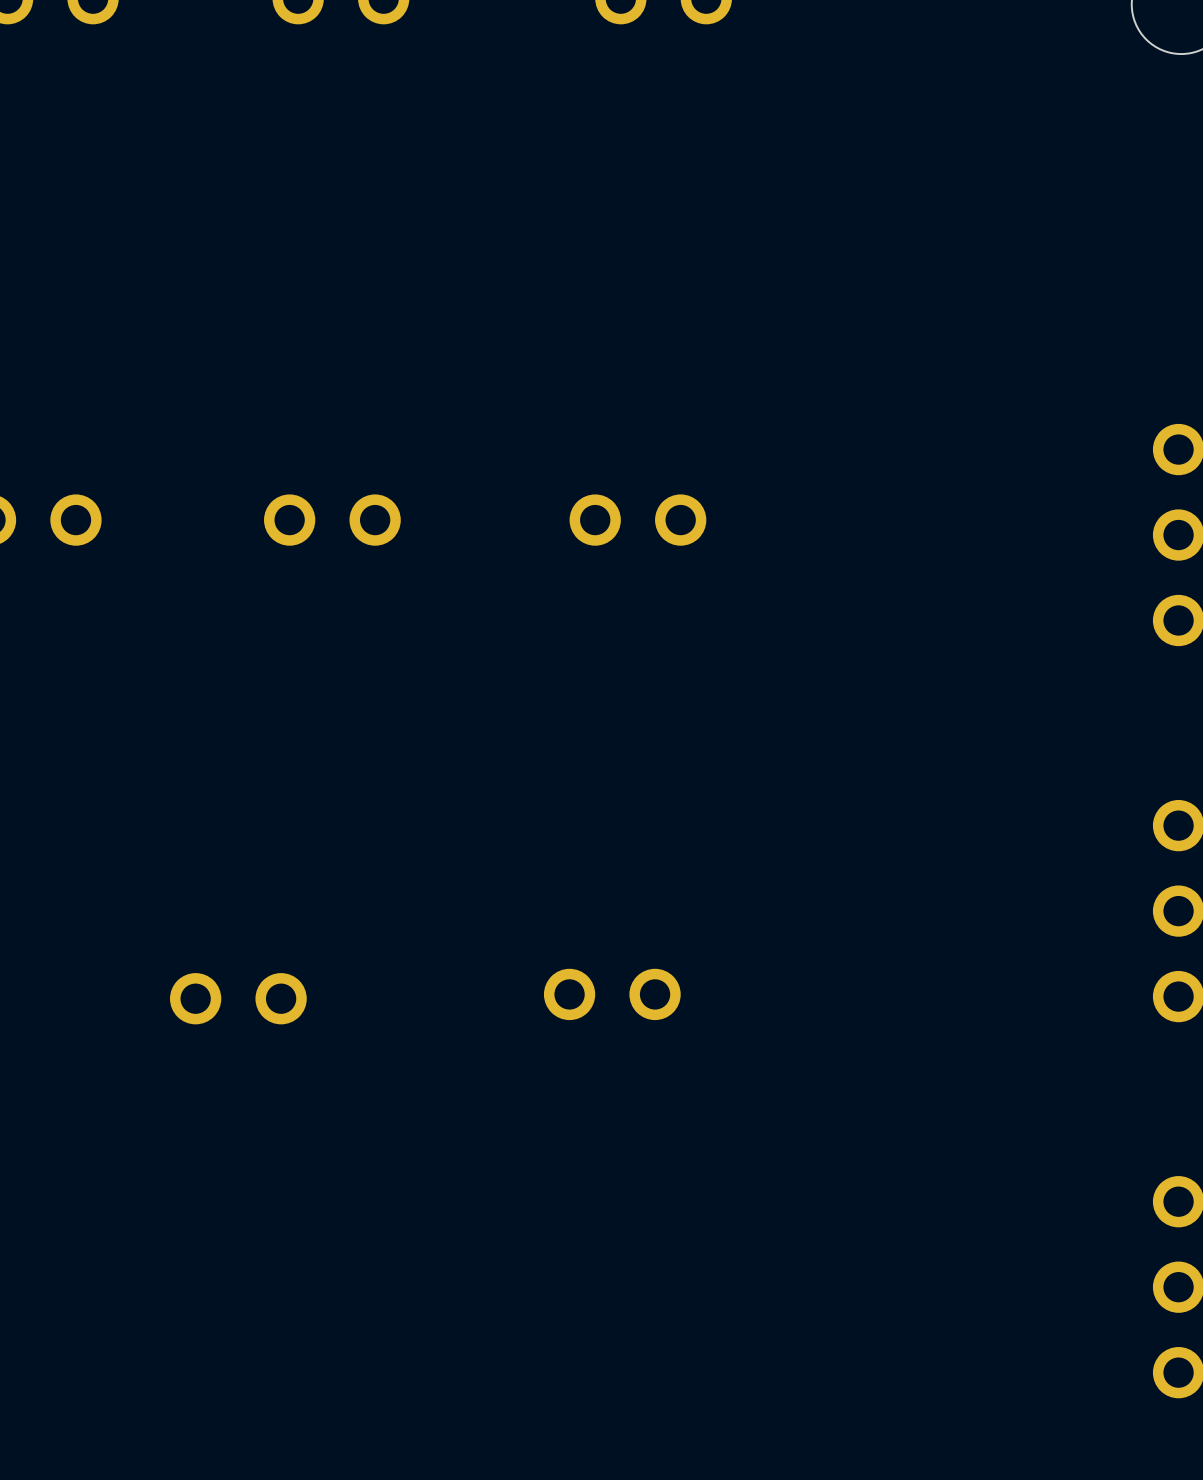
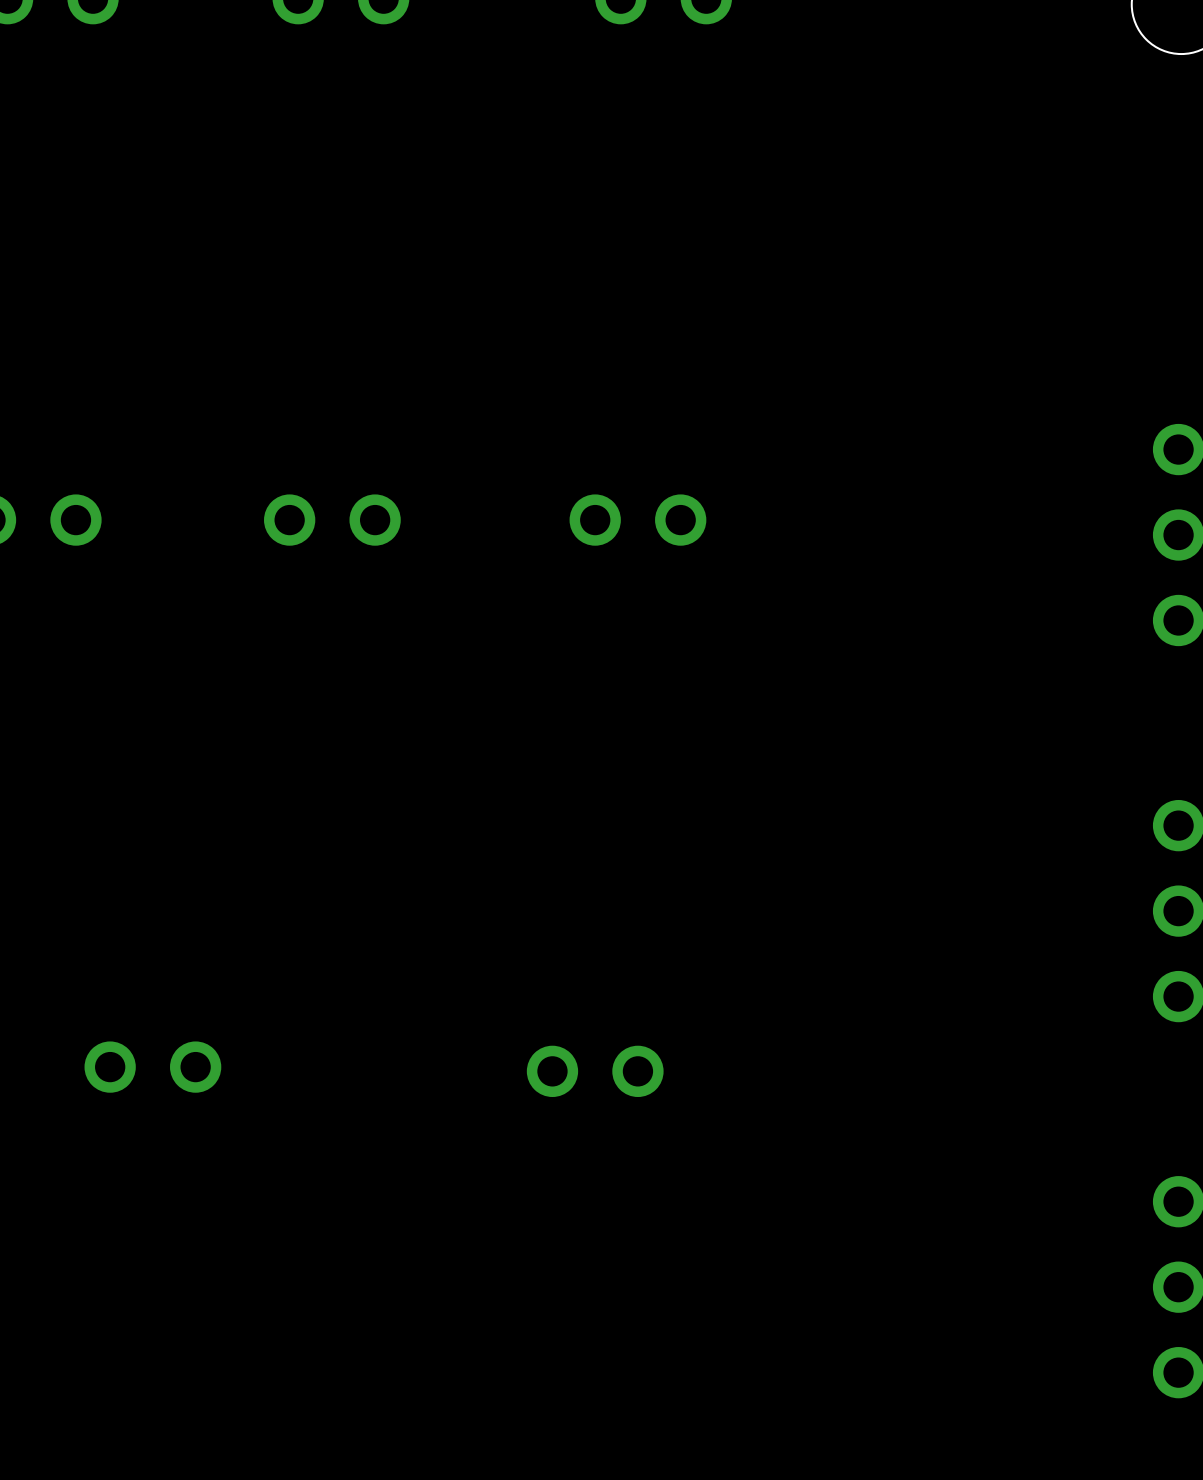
part position: (612, 994) -> (595, 1071)
part position: (238, 998) -> (152, 1067)

